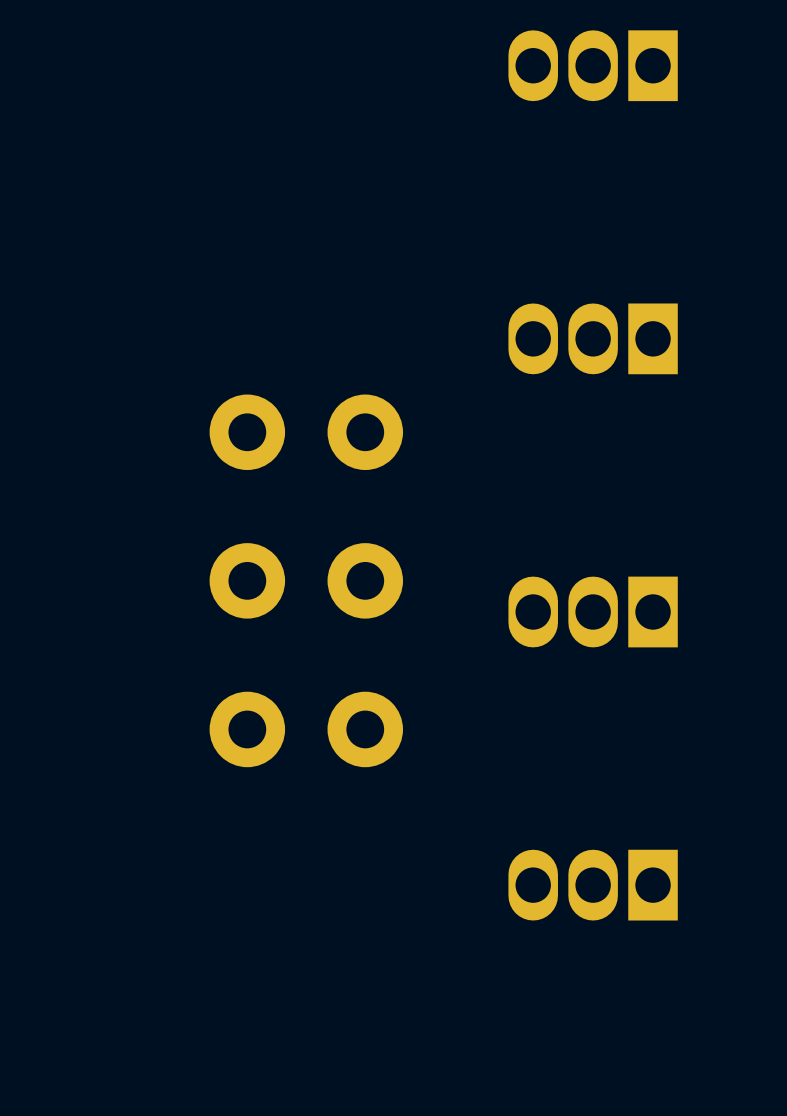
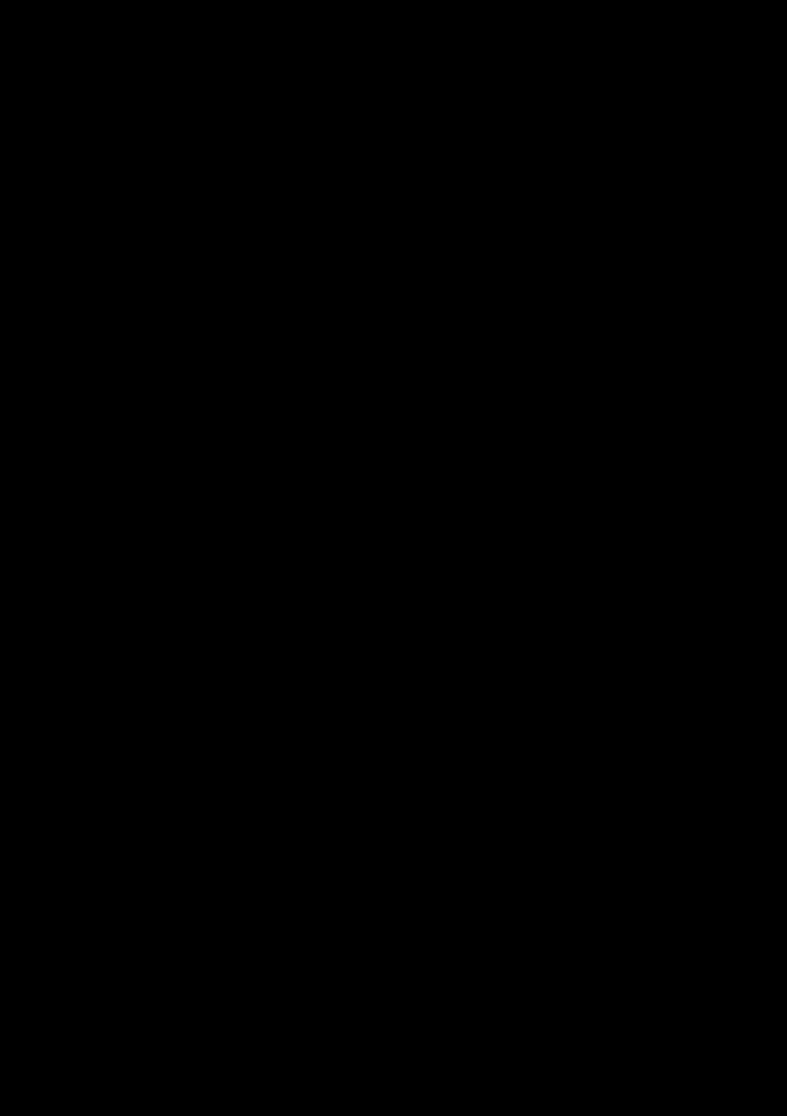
part: (593, 65) -> none
part: (593, 338) -> none
part: (306, 432) -> none
part: (306, 580) -> none
part: (593, 611) -> none
part: (306, 729) -> none
part: (593, 885) -> none

